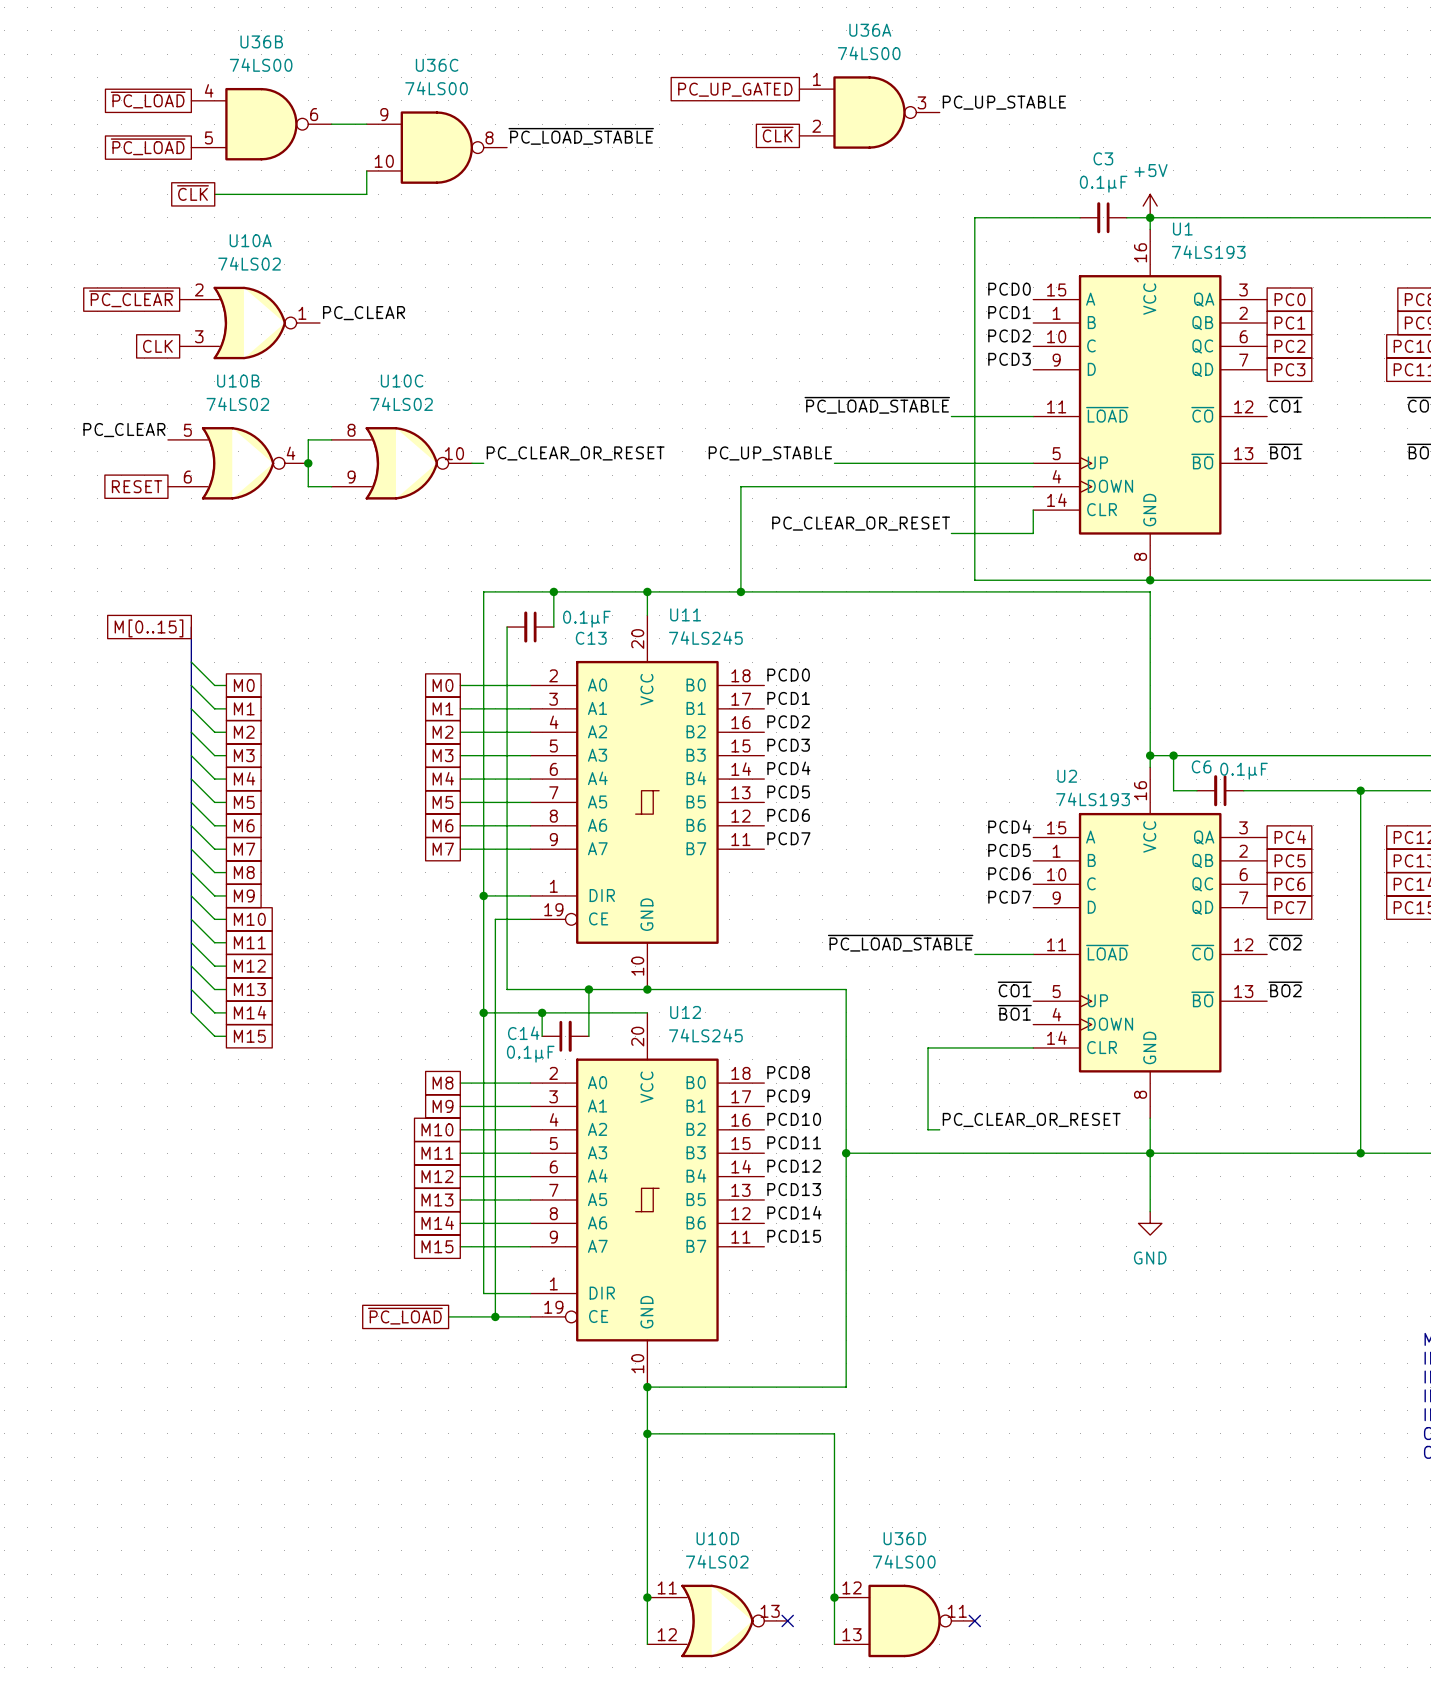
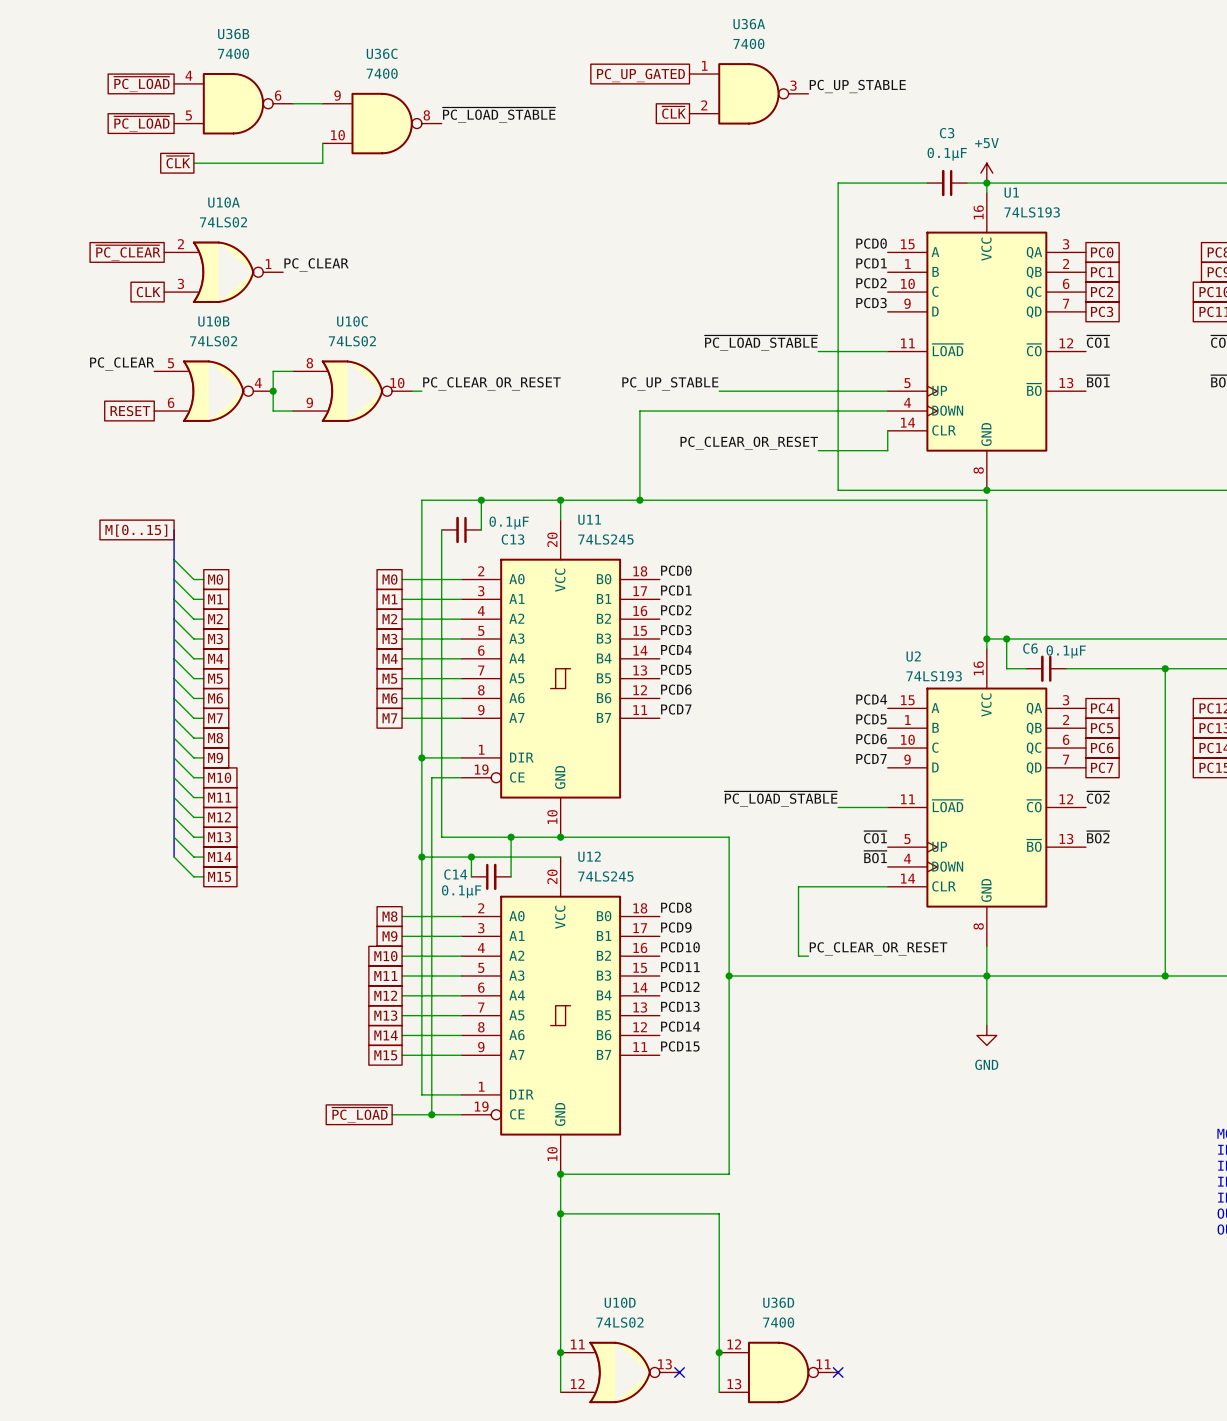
U36A value: 74LS00 (869, 53) -> 7400 (748, 43)
U36B value: 74LS00 (261, 65) -> 7400 (233, 53)
U36C value: 74LS00 (436, 88) -> 7400 (382, 73)
U36D value: 74LS00 (904, 1561) -> 7400 (778, 1322)

